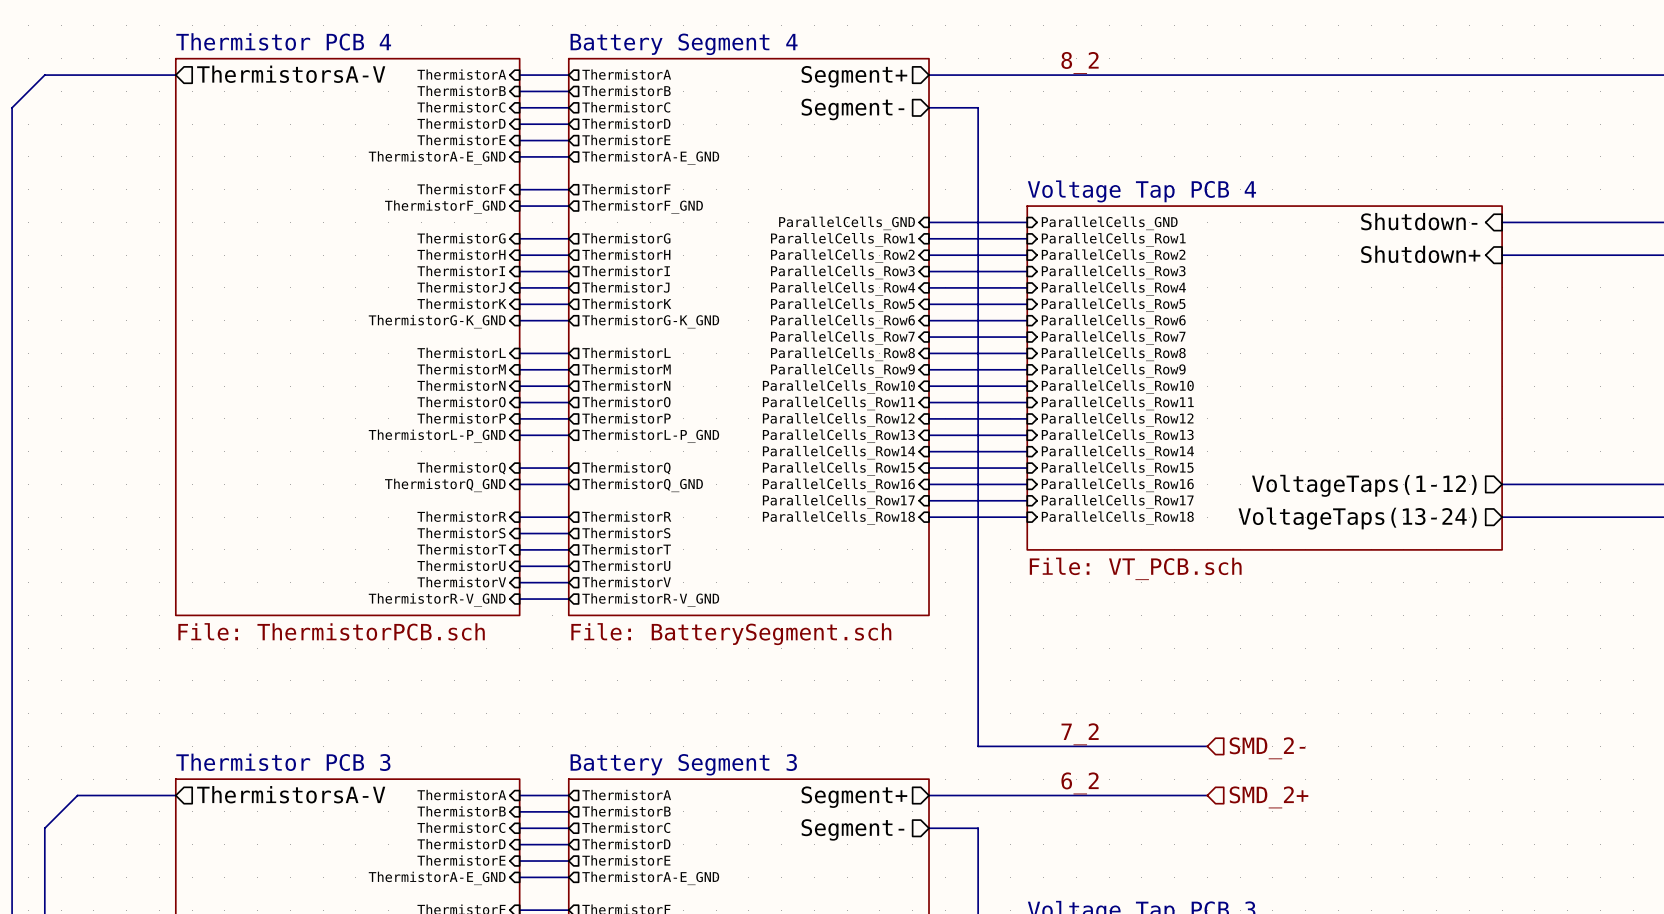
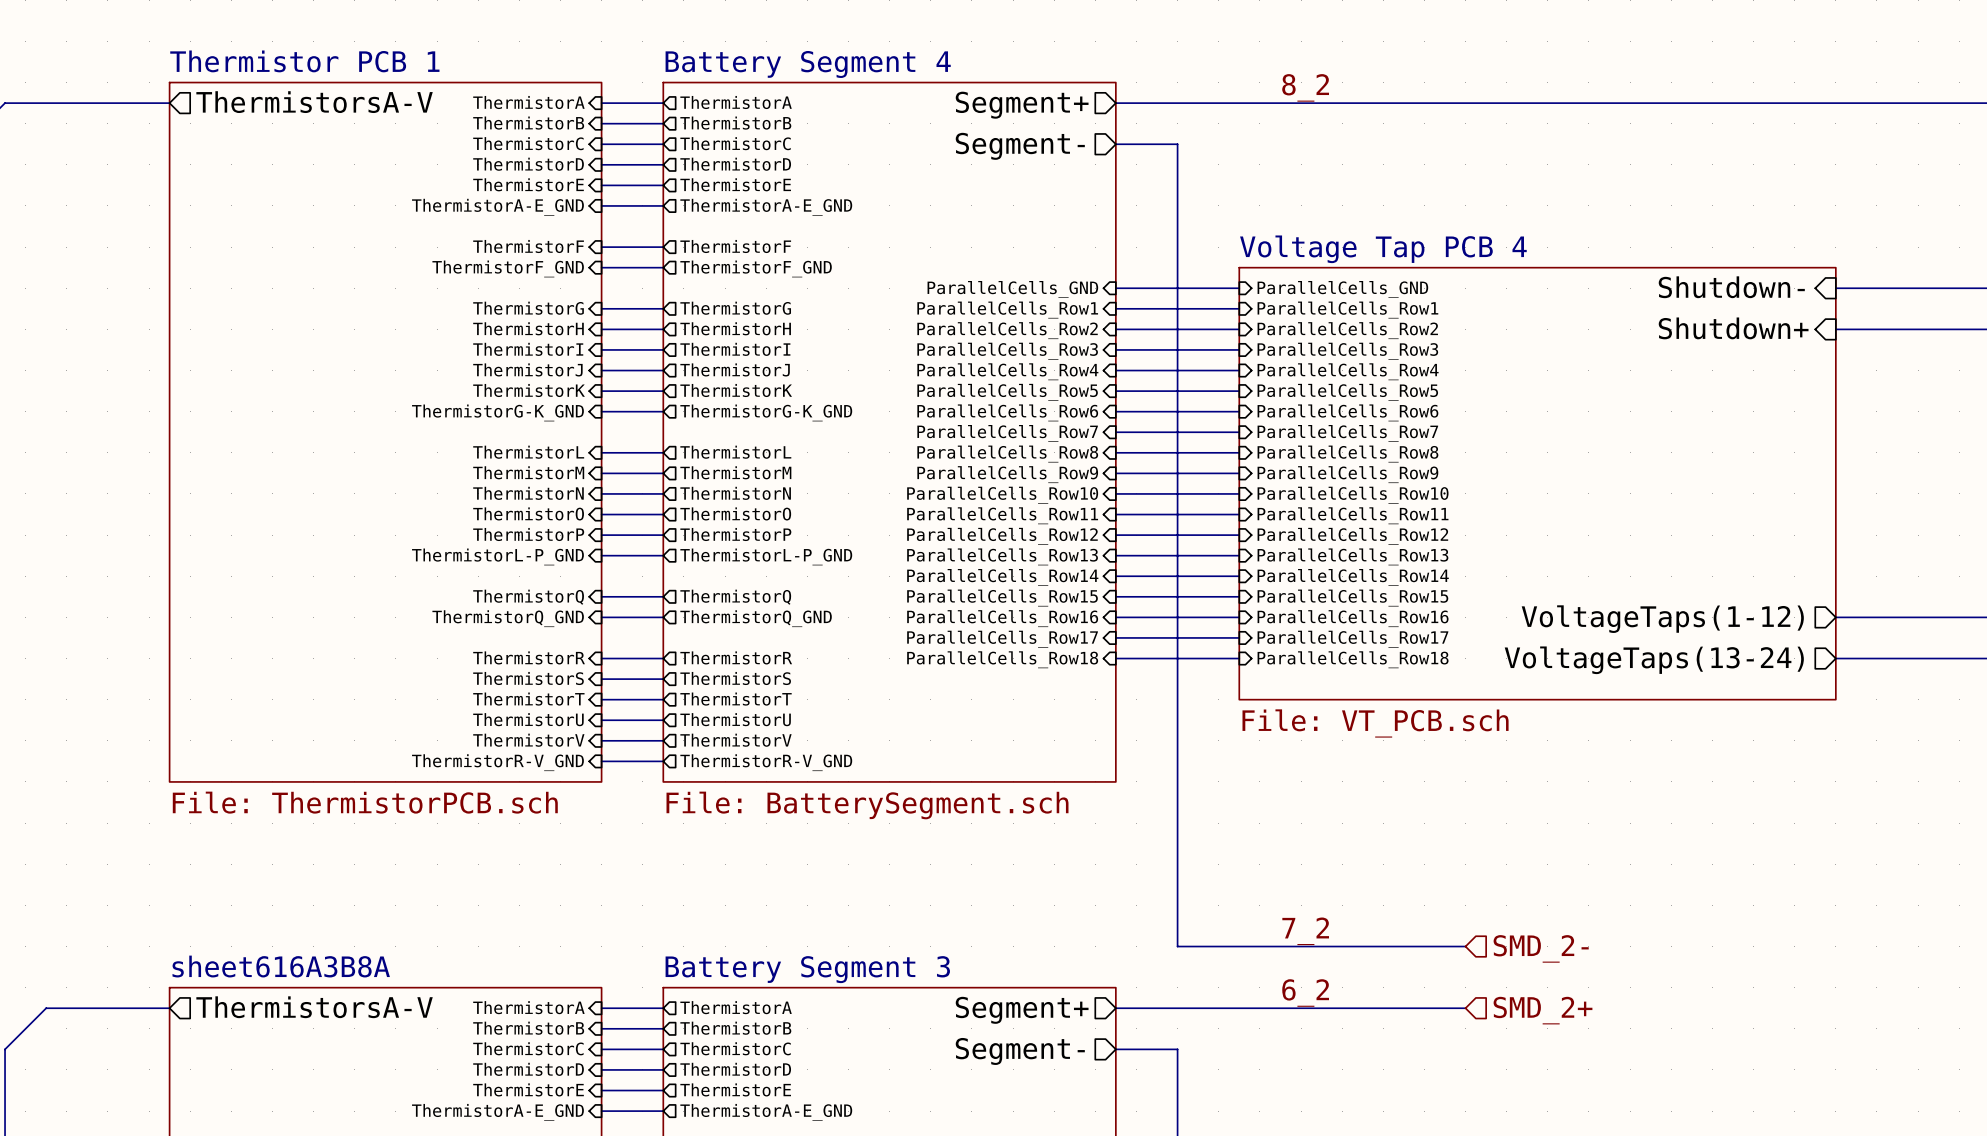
sheet Thermistor PCB 4 name: Thermistor PCB 4 (283, 41) -> Thermistor PCB 1 (304, 61)
sheet Thermistor PCB 3 name: Thermistor PCB 3 (283, 762) -> sheet616A3B8A (281, 966)

